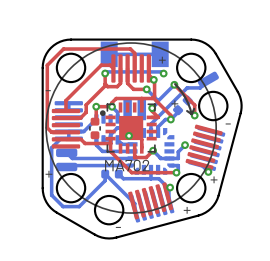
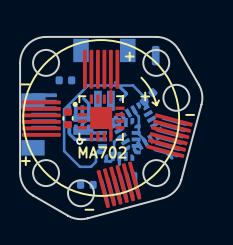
bottom track: (109, 54) (160, 54) -> none
part footprint: [111, 54, 151, 83] -> [82, 49, 120, 89]
part: none -> (155, 55)
top track: (113, 68) (110, 65) (101, 65) (65, 100) (65, 111) -> none
top track: (120, 68) (120, 83) (117, 86) (107, 86) (105, 84) (105, 73) -> none
top track: (127, 68) (127, 83) (133, 89) (146, 89) -> none
top track: (134, 68) (134, 53) (130, 49) (63, 49) (47, 65) (47, 127) (51, 132) (65, 132) -> none
top track: (148, 68) (148, 74) (154, 80) (154, 96) (152, 98) (116, 98) (112, 102) (112, 106) -> none
bottom track: (105, 73) (106, 71) (162, 71) (163, 73) -> none
via: (105, 73) -> none
via: (163, 73) -> none
via: (153, 79) -> none
bottom track: (208, 79) (200, 87) (187, 87) (150, 124) (150, 132) -> none
part: (208, 79) -> none
top track: (174, 84) (194, 105) (194, 115) -> none
bottom track: (174, 84) (158, 100) -> none
via: (174, 84) -> none
top track: (106, 85) (86, 104) (86, 112) (80, 118) (65, 118) -> none
part: none -> (65, 80)
via: (146, 89) -> none
top track: (153, 97) (170, 115) (170, 119) -> none
via: (96, 106) -> none
top track: (111, 106) (96, 106) (95, 121) -> none
via: (112, 106) -> none
part footprint: [51, 108, 81, 149] -> [21, 100, 61, 137]
top track: (152, 108) (152, 111) (158, 117) (151, 117) -> none
via: (152, 108) -> none
bottom track: (178, 110) (170, 119) (165, 119) (158, 126) (158, 132) -> none
bottom track: none -> (146, 106) (146, 99) (132, 85) (88, 85) (64, 109) (64, 151) (79, 166) (91, 166) (95, 161) (95, 153) (100, 148) (104, 148)
via: (194, 115) -> none
bottom track: (96, 118) (83, 131) (68, 131) (68, 138) (60, 138) (51, 147) (51, 195) (63, 206) (79, 206) (105, 180) (105, 174) (134, 203) (134, 208) -> none
bottom track: none -> (134, 109) (138, 116) (138, 134) (145, 142)
via: (170, 119) -> none
part footprint: [185, 124, 223, 170] -> [146, 113, 193, 159]
part: none -> (57, 124)
via: (129, 135) -> none
top track: (110, 138) (110, 151) (131, 172) (176, 172) -> none
part: none -> (136, 127)
top track: (65, 139) (80, 139) (85, 143) (110, 143) -> none
bottom track: (185, 145) (178, 151) (178, 158) (160, 158) (153, 150) -> none
via: (185, 145) -> none
bottom track: none -> (122, 136) (114, 142) (114, 157) (110, 161) (104, 161)
top track: (134, 148) (134, 157) (146, 157) (153, 150) -> none
via: (153, 150) -> none
bottom track: (66, 152) (72, 158) (132, 158) -> none
part: (66, 152) -> none
via: none -> (79, 141)
bottom track: (130, 165) (66, 166) -> none
bottom track: (171, 165) (178, 165) (176, 172) -> none
part: (66, 166) -> none
via: (208, 171) -> none
via: (176, 172) -> none
part position: (112, 174) -> (86, 184)
bottom track: (118, 174) (123, 178) (158, 178) (168, 188) (170, 187) -> none
text: + (214, 179) -> none
part footprint: [128, 182, 174, 220] -> [96, 161, 142, 209]
via: (170, 187) -> none
text: + (187, 210) -> none

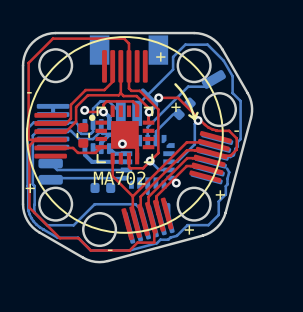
part footprint: [82, 49, 120, 89] -> [102, 50, 148, 83]
part: (155, 55) -> none
top track: none -> (112, 73) (112, 81) (104, 90) (85, 90) (70, 104) (70, 118) (66, 123) (50, 123)
top track: none -> (120, 73) (120, 93)
bottom track: none -> (213, 79) (206, 86) (188, 86) (147, 127) (147, 139)
part: none -> (213, 79)
part: (65, 80) -> none
top track: none -> (120, 93) (123, 96) (136, 96) (148, 107) (148, 122)
top track: none -> (120, 93) (118, 95) (87, 95) (76, 107) (76, 121) (66, 131) (50, 131)
top track: none -> (158, 97) (178, 97) (208, 127) (216, 130) (229, 130) (236, 138) (236, 149) (230, 155) (222, 155)
via: none -> (158, 97)
top track: (110, 90) (110, 94) -> (84, 110) (103, 111) (103, 104) (106, 101) (133, 101) (137, 105)
via: none -> (84, 110)
via: none -> (103, 111)
via: none -> (149, 112)
part footprint: [21, 100, 61, 137] -> [34, 112, 67, 159]
bottom track: none -> (120, 113) (108, 101) (100, 101) (93, 108) (93, 124)
bottom track: none -> (173, 114) (155, 131) (155, 139)
bottom track: (146, 106) (146, 99) (132, 85) (88, 85) (64, 109) (64, 151) (79, 166) (91, 166) (95, 161) (95, 153) (100, 148) (104, 148) -> none
bottom track: none -> (198, 120) (194, 123) (194, 144) (177, 161) (168, 161)
via: none -> (198, 120)
bottom track: none -> (101, 124) (102, 133) (112, 133) (116, 129) (127, 129) (137, 120) (137, 105) (173, 69) (173, 56) (185, 44) (207, 44) (223, 60) (232, 76) (232, 93) (240, 101) (240, 139) (237, 142) (233, 155) (230, 157)
bottom track: (134, 109) (138, 116) (138, 134) (145, 142) -> none
bottom track: none -> (93, 125) (93, 131) (90, 133) (81, 133) (75, 122) (33, 122) (27, 128) (28, 210) (33, 221) (43, 229)
part footprint: [146, 113, 193, 159] -> [189, 130, 232, 183]
bottom track: none -> (101, 130) (93, 139) (79, 139) (70, 130) (37, 130) (32, 135) (34, 212) (47, 225) (73, 225) (94, 204) (135, 204) (138, 207)
top track: none -> (35, 139) (29, 145) (29, 207) (59, 238) (78, 238) (90, 250) (129, 250) (137, 242) (154, 242) (151, 217)
top track: none -> (50, 139) (28, 139) (28, 62) (52, 38) (124, 38) (128, 43) (128, 88) (131, 90) (139, 90) (158, 109) (158, 153) (143, 168) (130, 168) (128, 158)
top track: none -> (203, 142) (186, 142) (132, 196)
part: (57, 124) -> none
via: none -> (122, 143)
top track: none -> (101, 147) (95, 152) (77, 152) (73, 147) (50, 147)
part: (136, 127) -> none
top track: none -> (211, 153) (187, 150) (140, 196) (140, 209)
top track: none -> (112, 158) (112, 176) (132, 196)
bottom track: (122, 136) (114, 142) (114, 157) (110, 161) (104, 161) -> none
bottom track: none -> (150, 161) (159, 170) (168, 170)
via: none -> (150, 161)
top track: none -> (209, 160) (187, 158) (148, 196) (148, 207)
bottom track: none -> (50, 163) (57, 170) (126, 170)
part: none -> (50, 163)
via: (79, 141) -> none
top track: none -> (207, 168) (186, 166) (156, 196) (159, 215)
bottom track: none -> (227, 168) (229, 172) (225, 194) (218, 201) (218, 214) (208, 225) (187, 225) (176, 235) (168, 239) (160, 239) (156, 243) (129, 250) (90, 250) (78, 237) (57, 237) (43, 229)
bottom track: none -> (123, 178) (52, 178) (50, 179)
bottom track: (166, 152) (171, 158) -> none
part: none -> (50, 179)
via: none -> (176, 183)
part footprint: [96, 161, 142, 209] -> [121, 197, 174, 241]
top track: none -> (132, 196) (132, 211)
text: none -> + (220, 194)
part position: (86, 184) -> (102, 187)
text: none -> + (189, 229)

